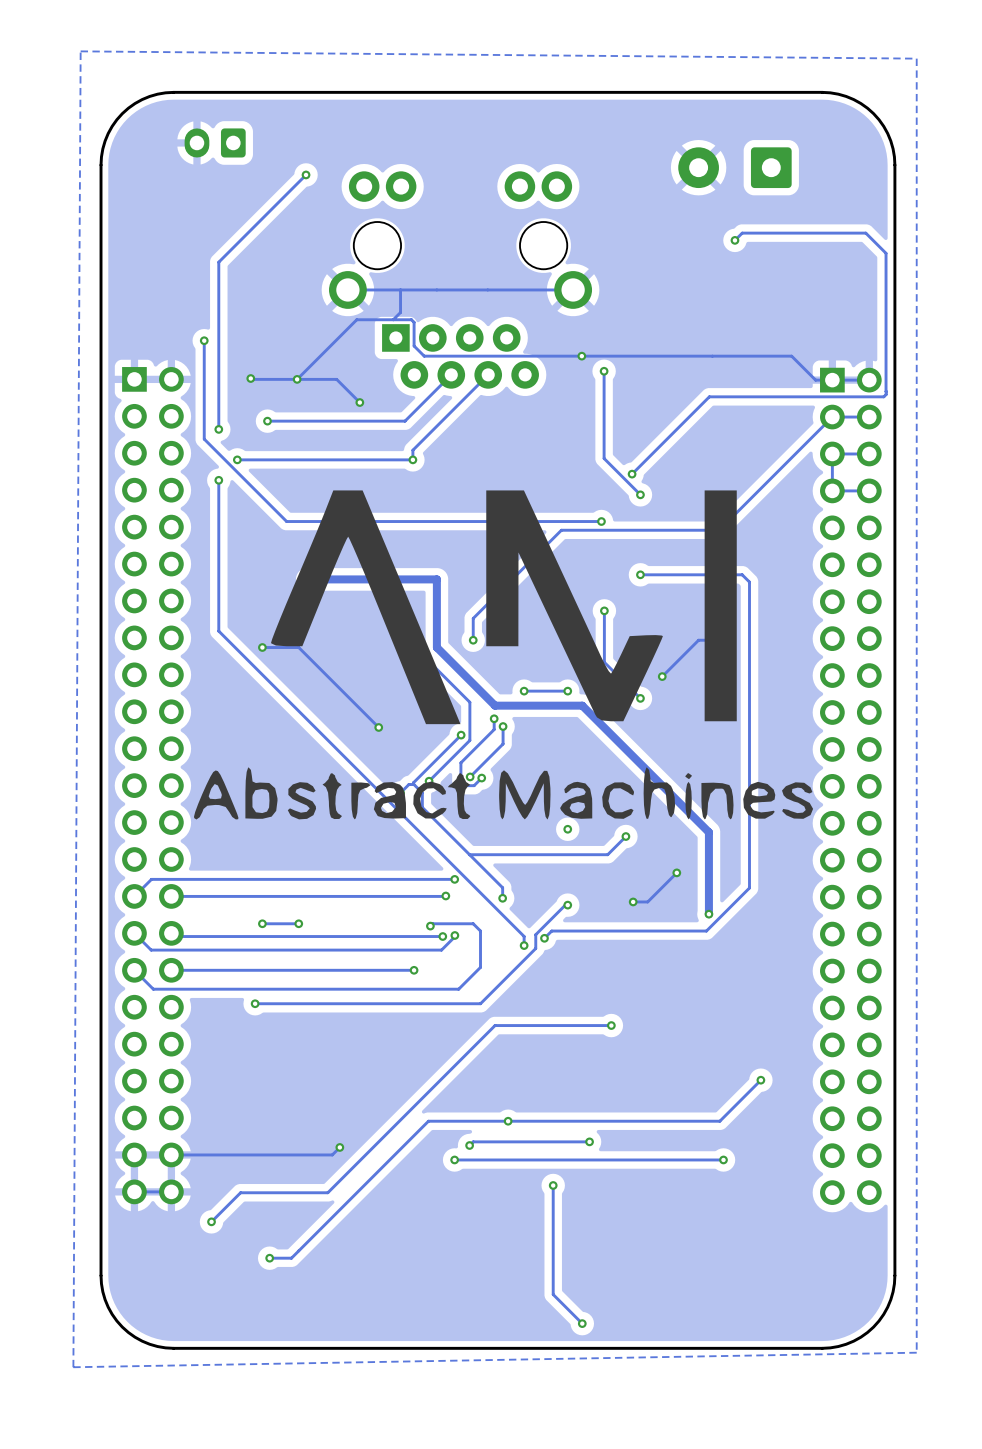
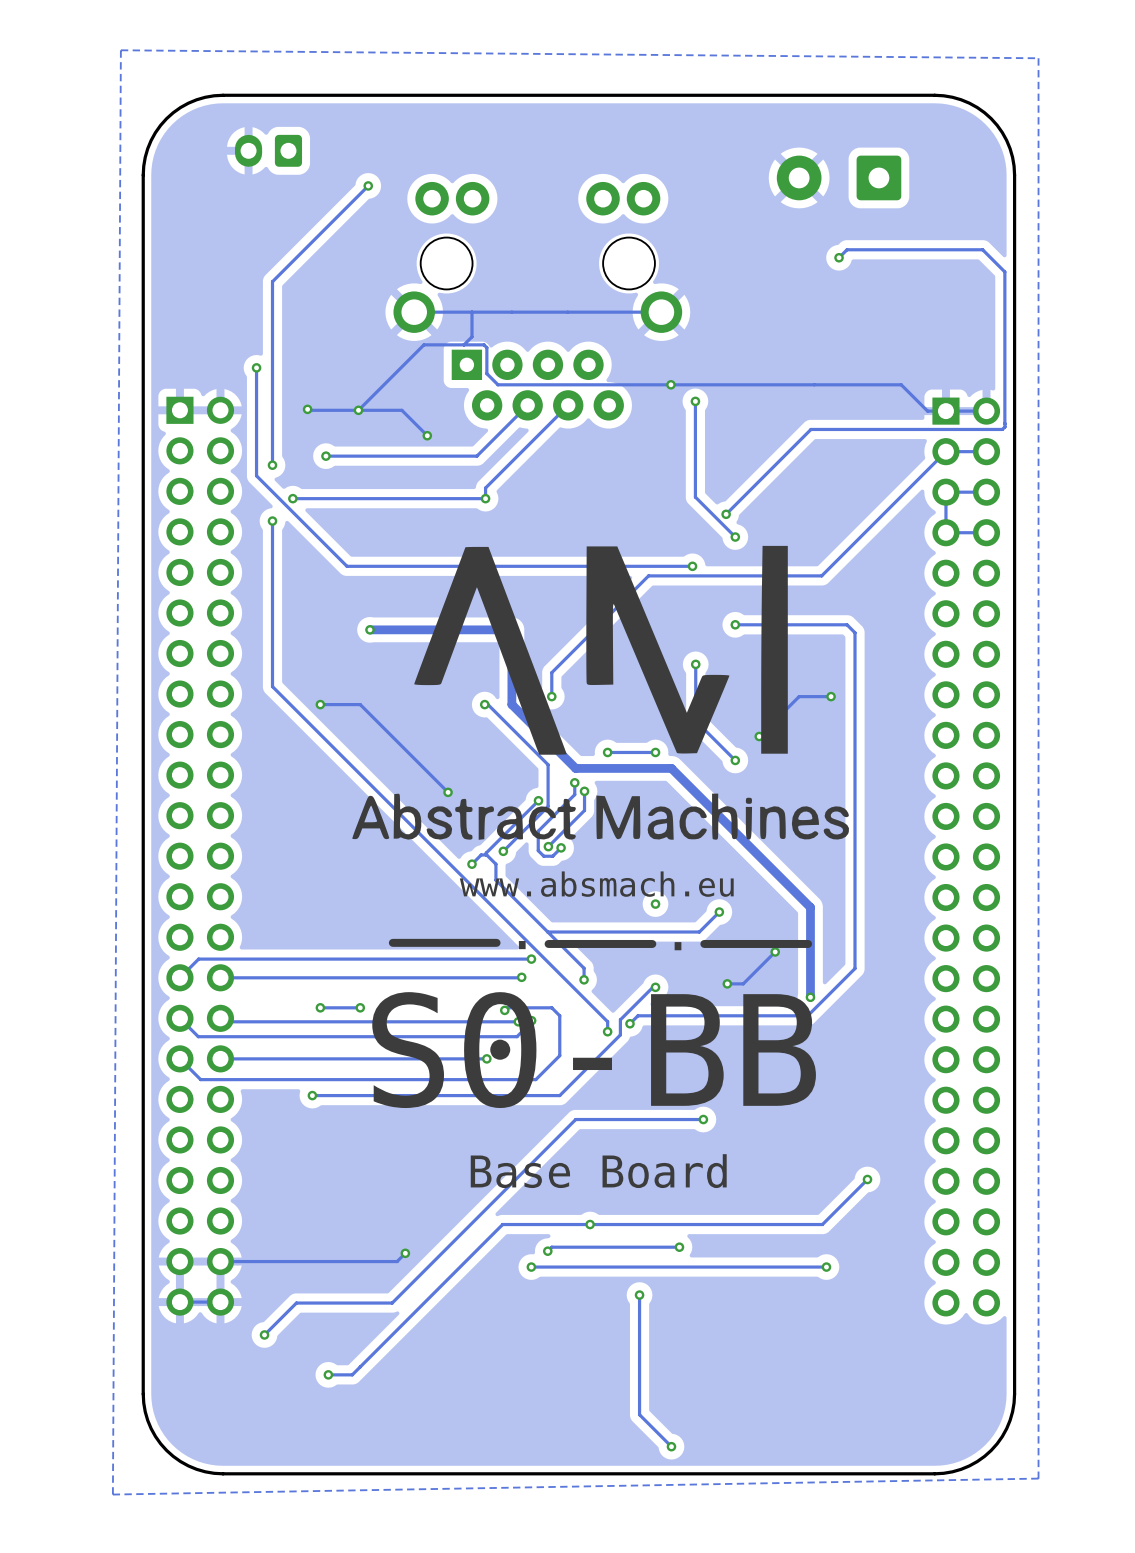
drawing: [194, 490, 814, 820] -> none
drawing: none -> [352, 545, 849, 840]
text: none -> www.absmach.eu (596, 884)
line: none -> (496, 942) (392, 942)
line: none -> (652, 943) (548, 943)
line: none -> (808, 943) (704, 943)
text: none -> . (522, 945)
text: none -> . (678, 946)
text: none -> S0-BB (594, 1050)
text: none -> Base Board (598, 1171)

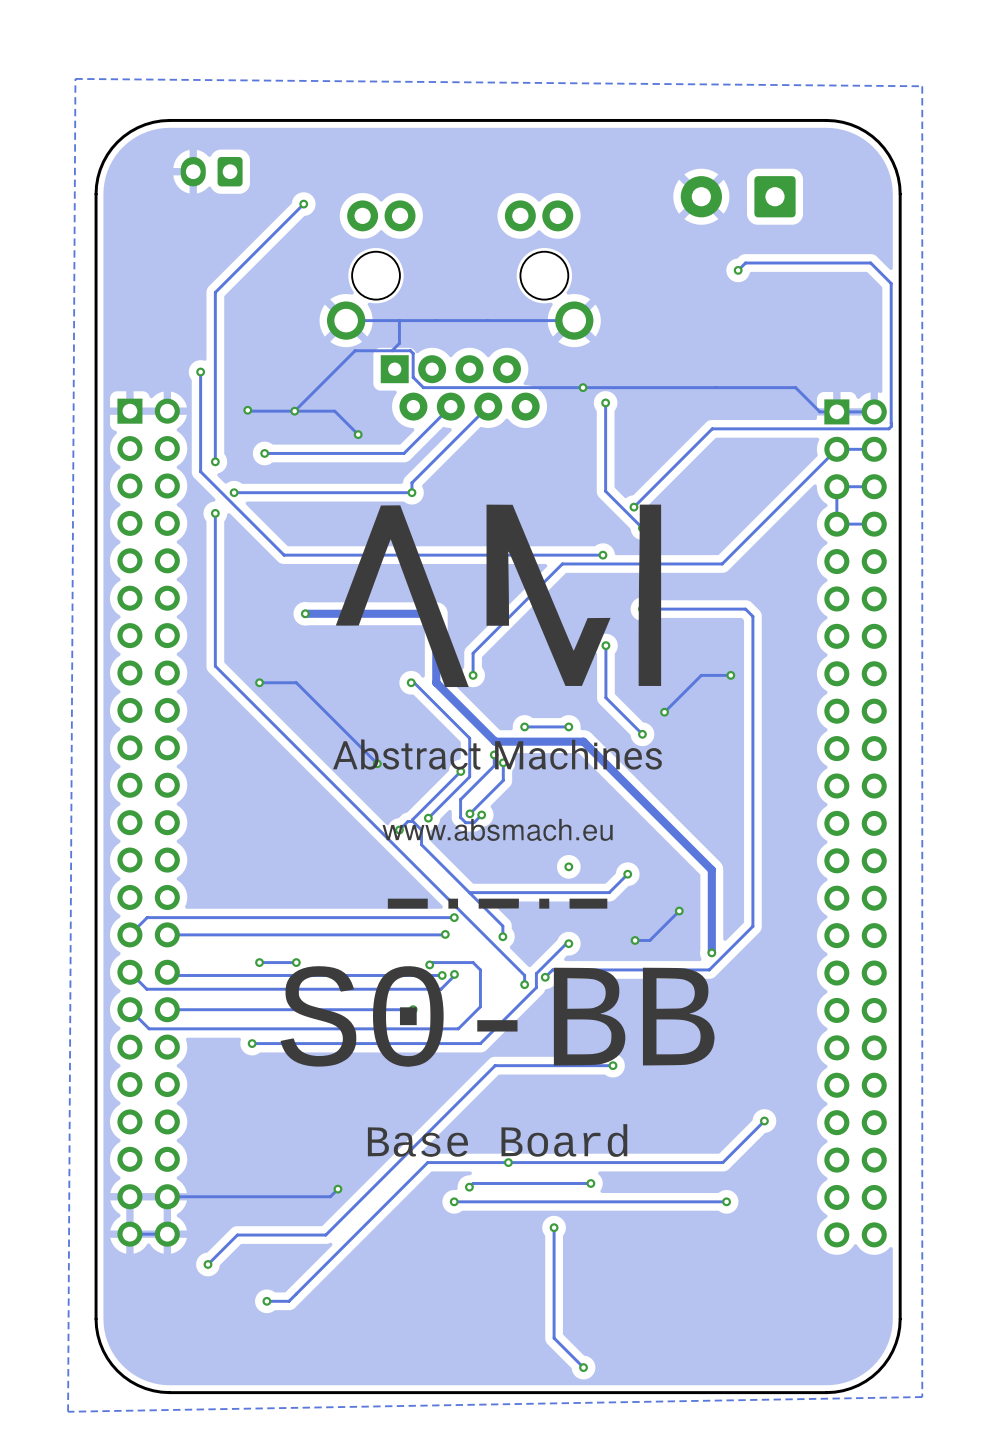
drawing: none -> [280, 504, 715, 1157]
drawing: [352, 545, 849, 840] -> none
text: www.absmach.eu (596, 884) -> none
line: (496, 942) (392, 942) -> none
line: (652, 943) (548, 943) -> none
line: (808, 943) (704, 943) -> none
text: . (522, 945) -> none
text: . (678, 946) -> none
text: S0-BB (594, 1050) -> none
text: Base Board (598, 1171) -> none

